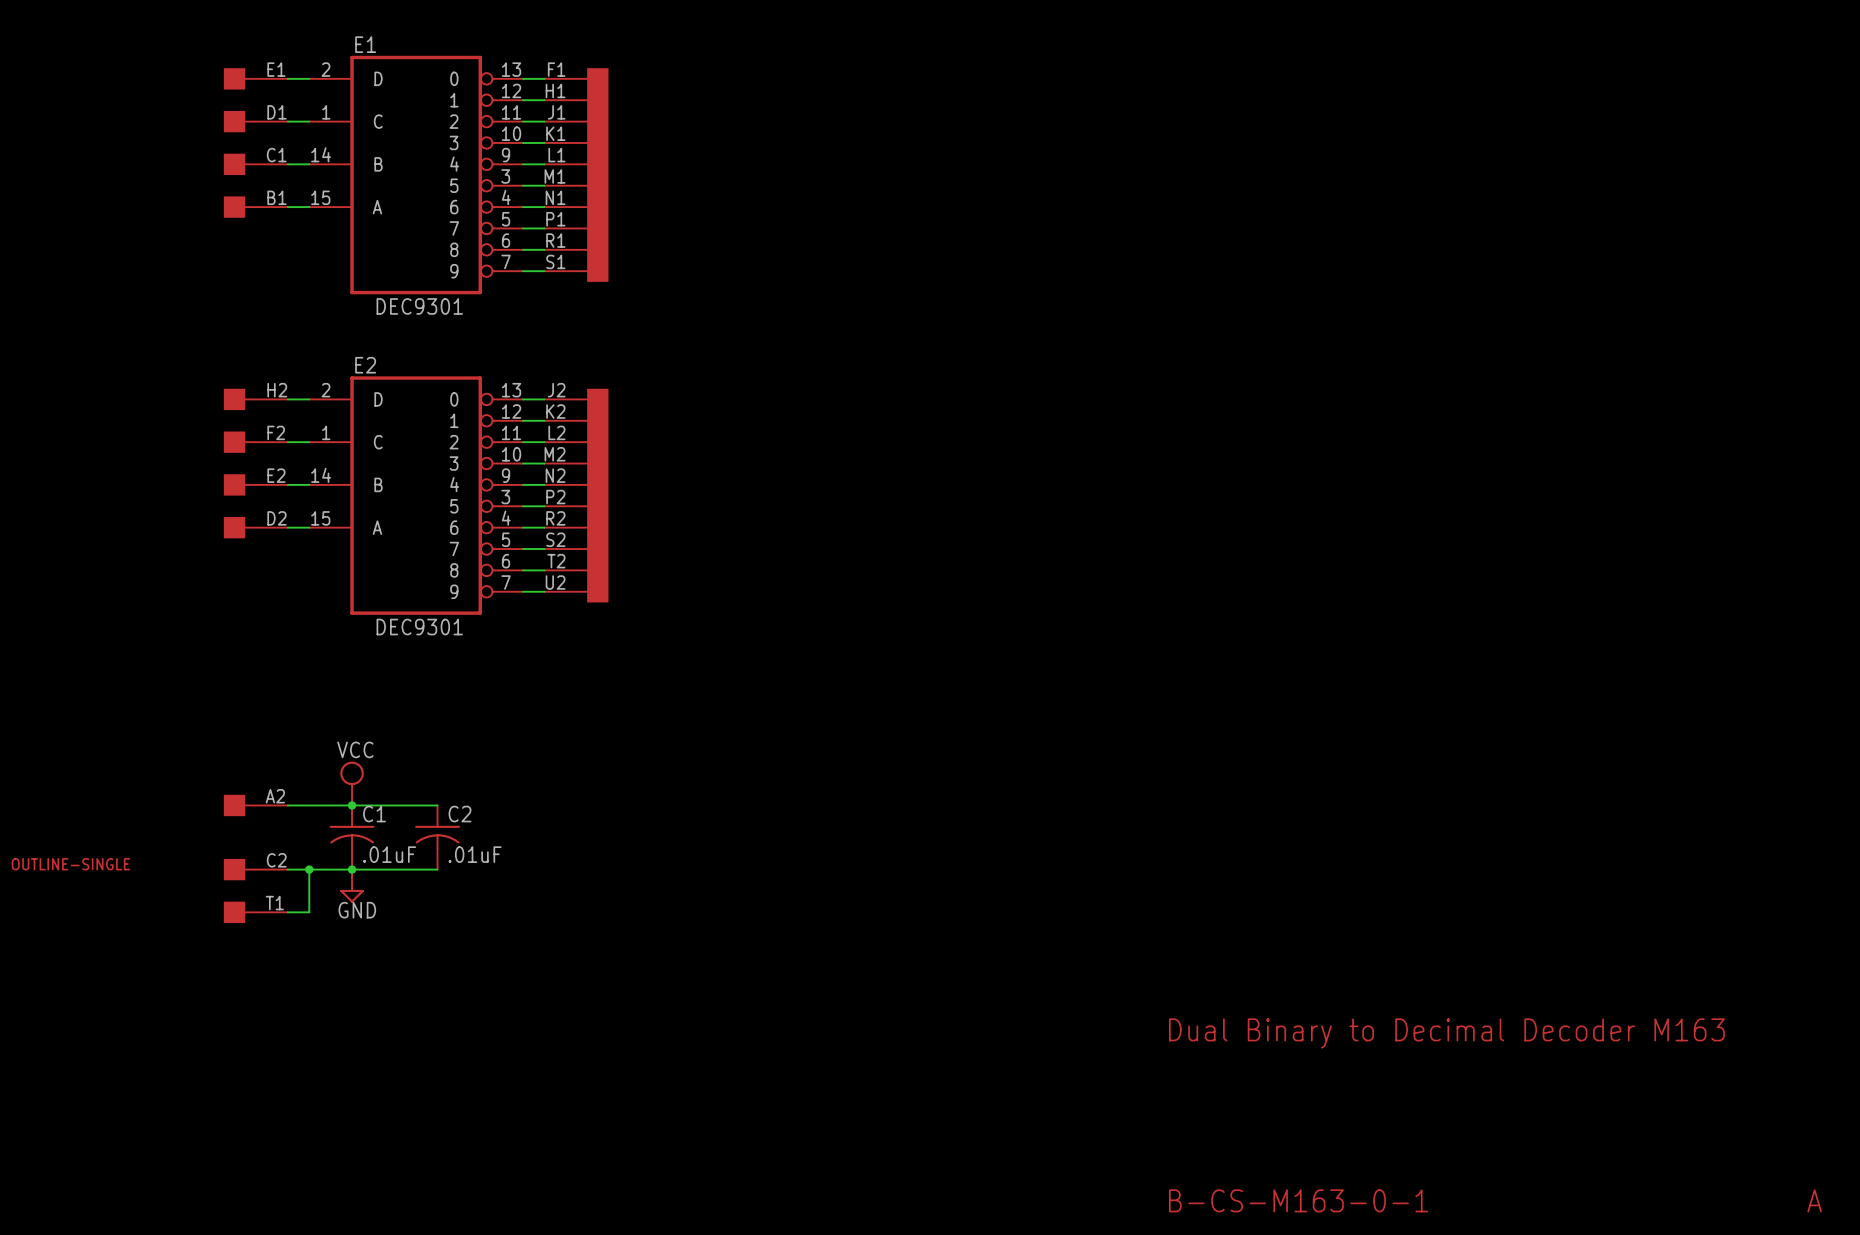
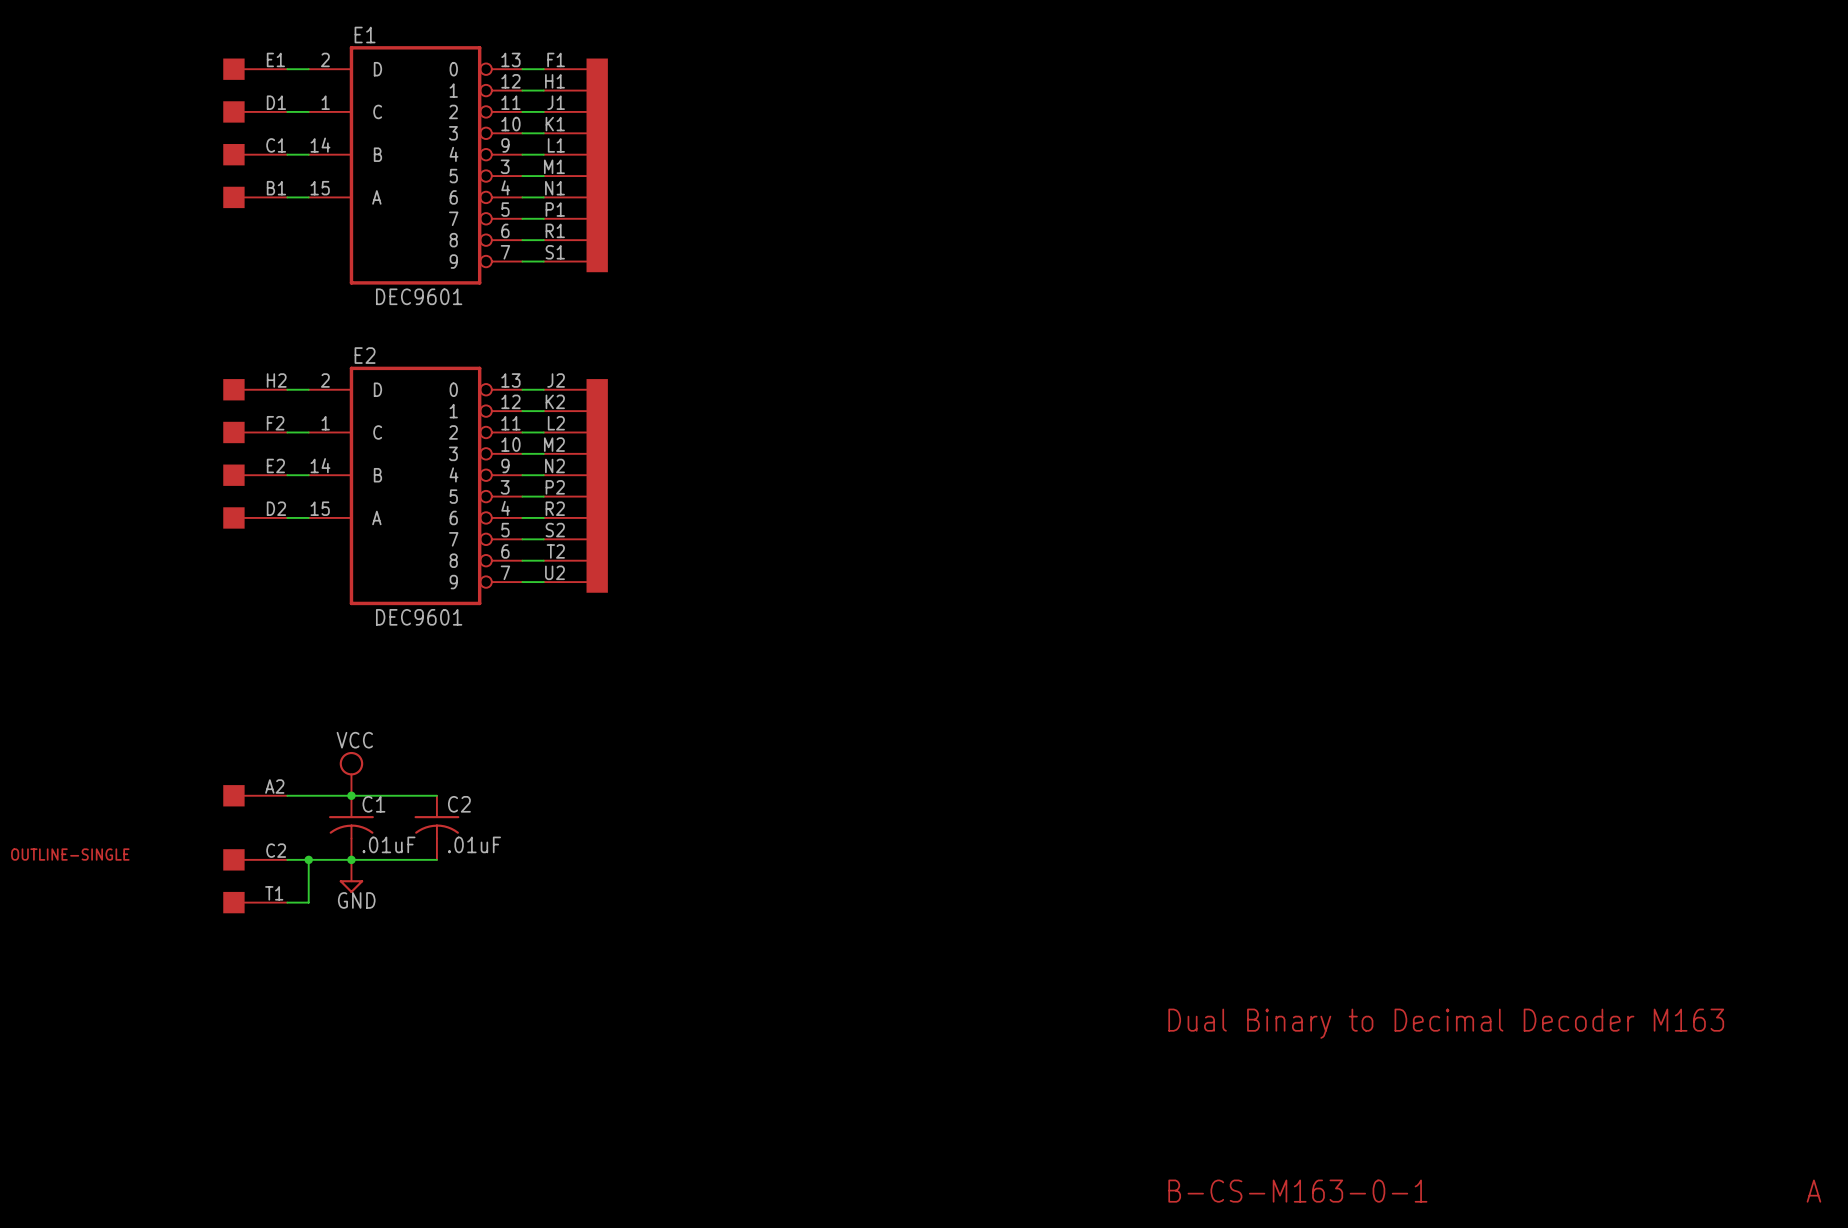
E1 value: DEC9301 (419, 306) -> DEC9601 (419, 296)
E2 value: DEC9301 (419, 627) -> DEC9601 (419, 617)

